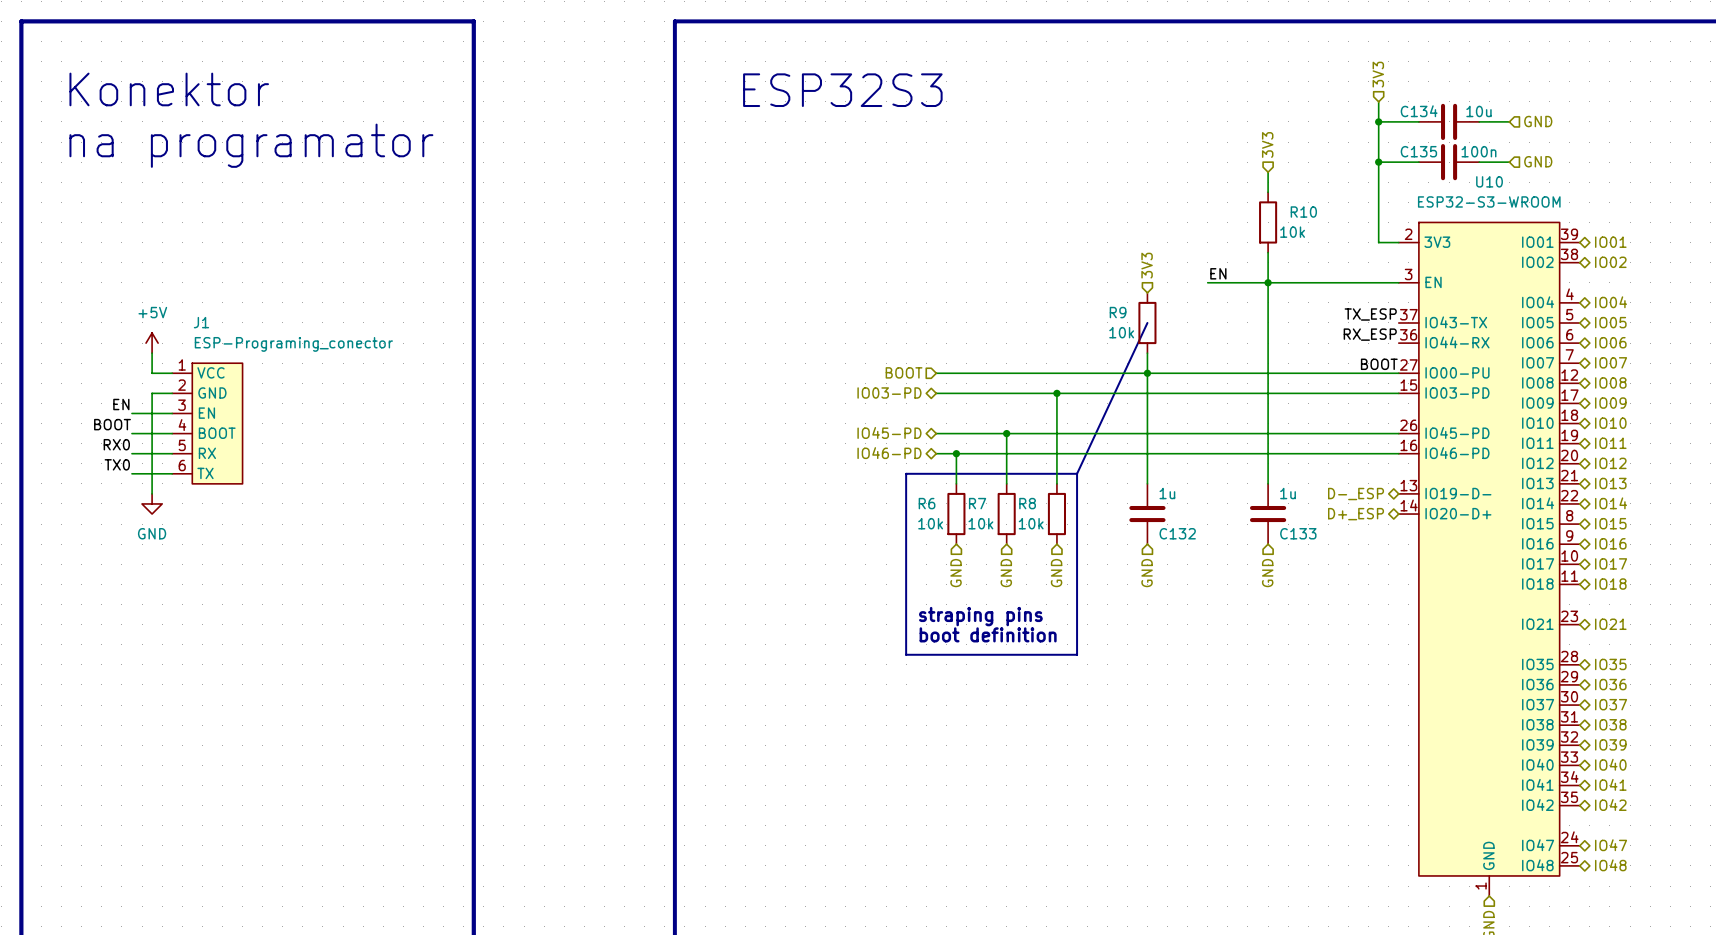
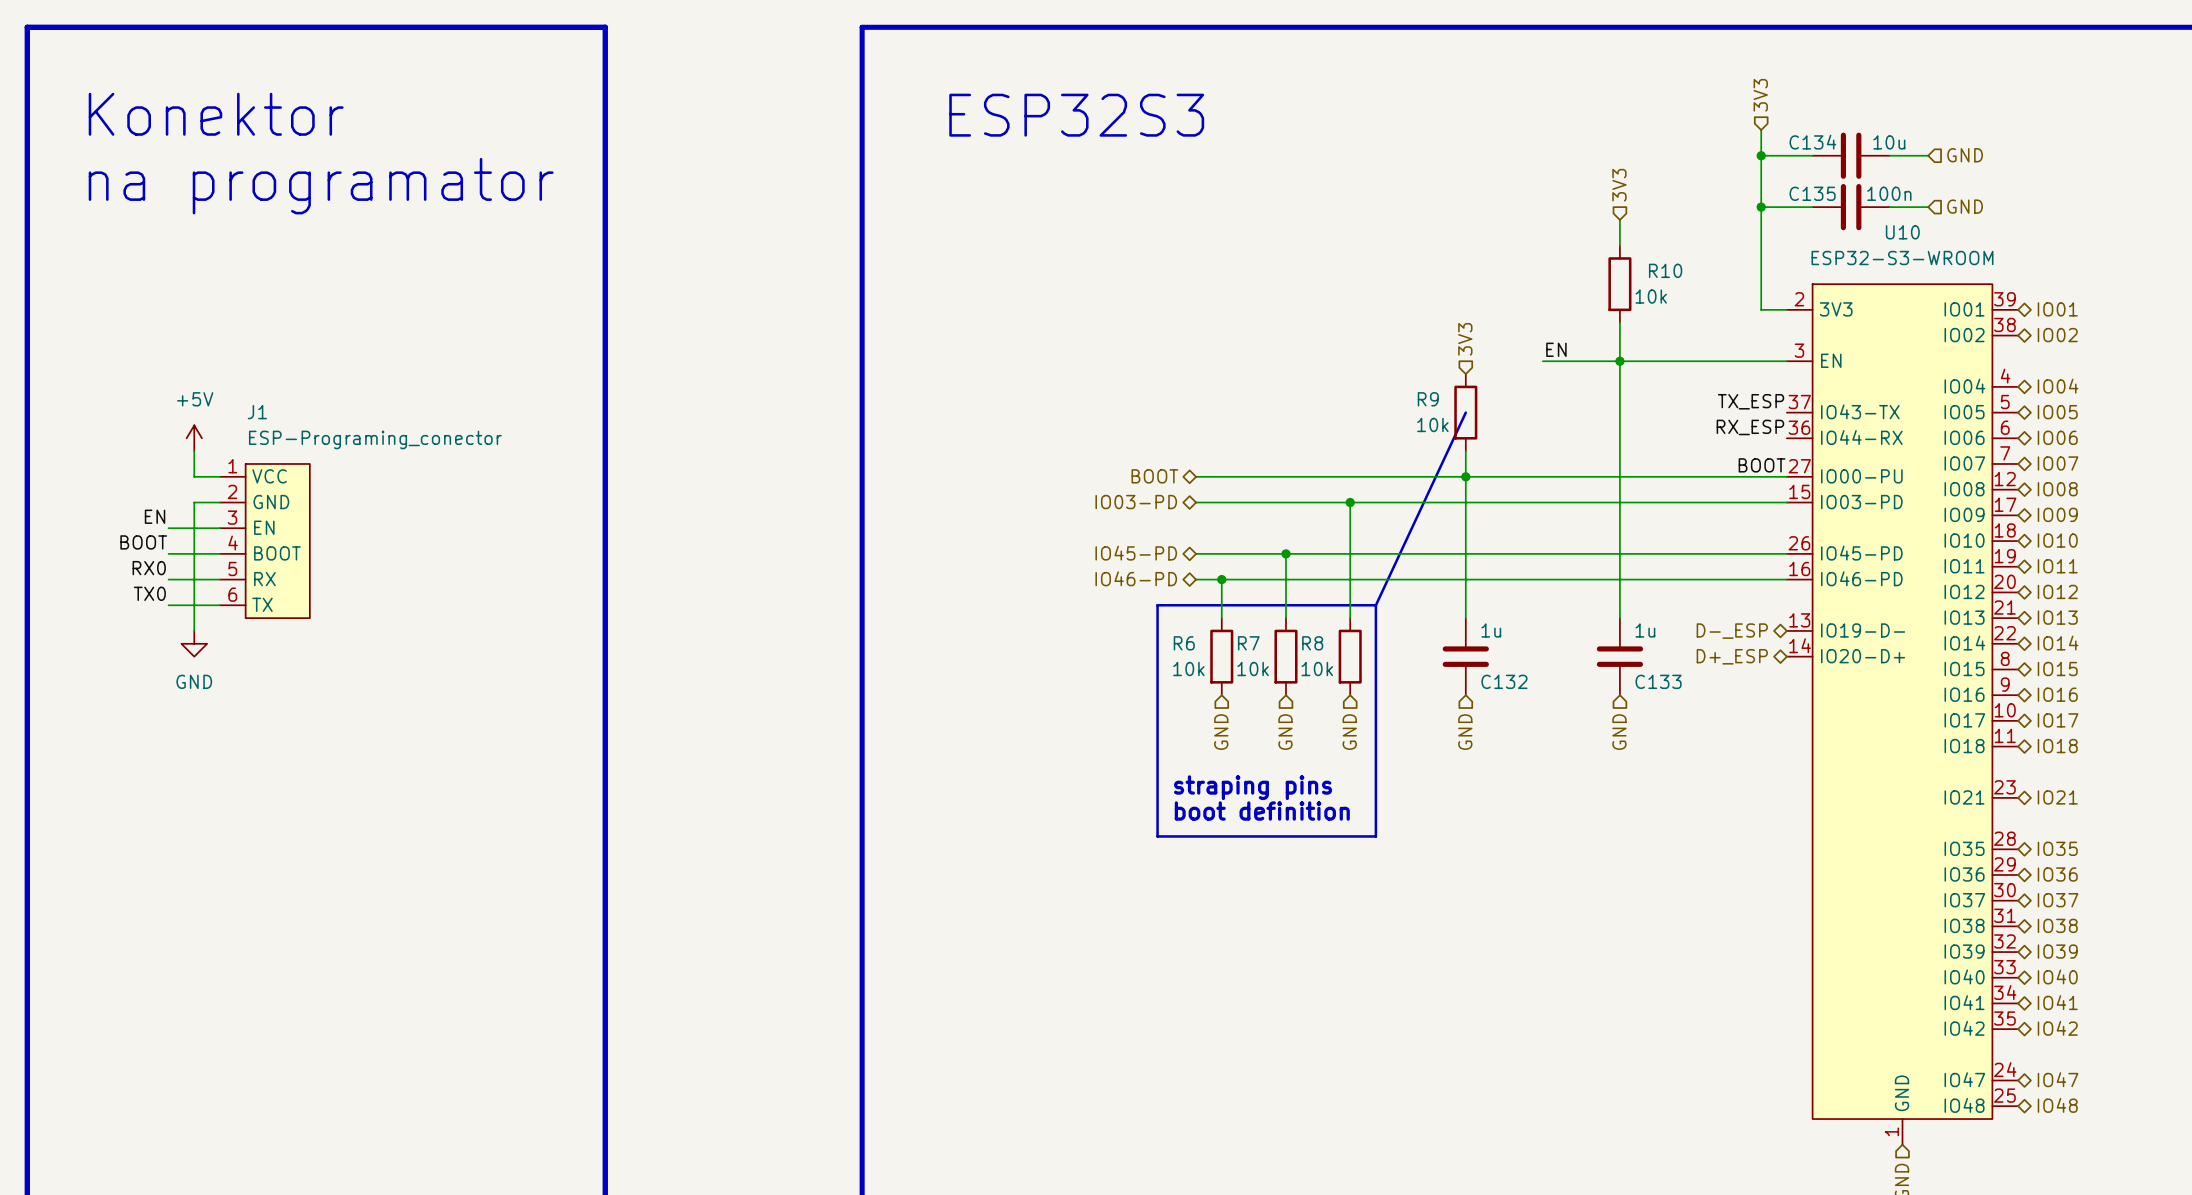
hierarchical label shape: input (904, 372) -> bidirectional (1154, 476)

